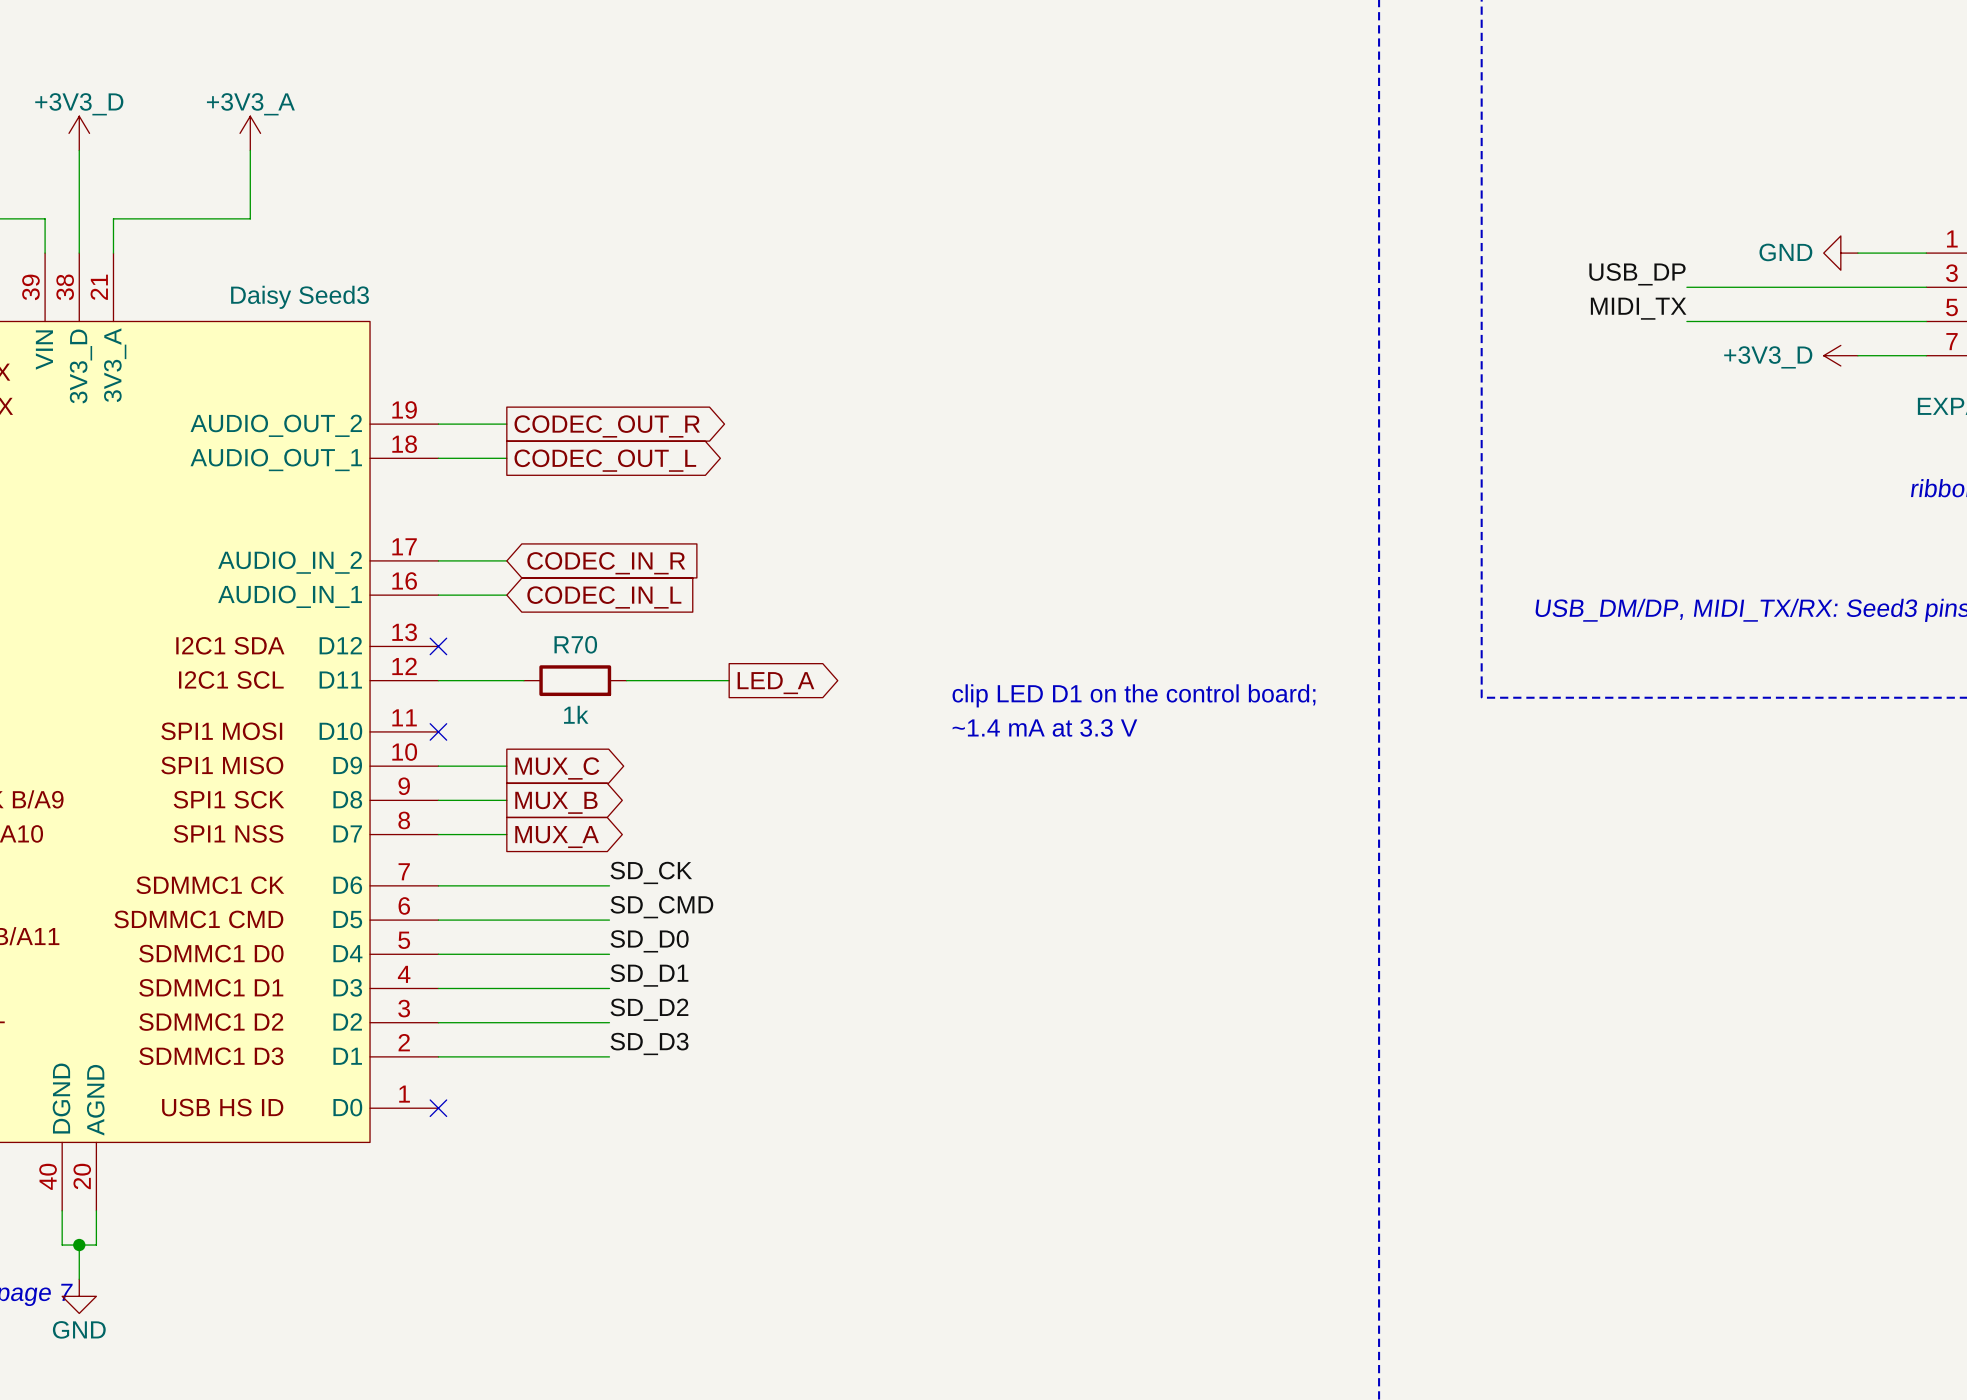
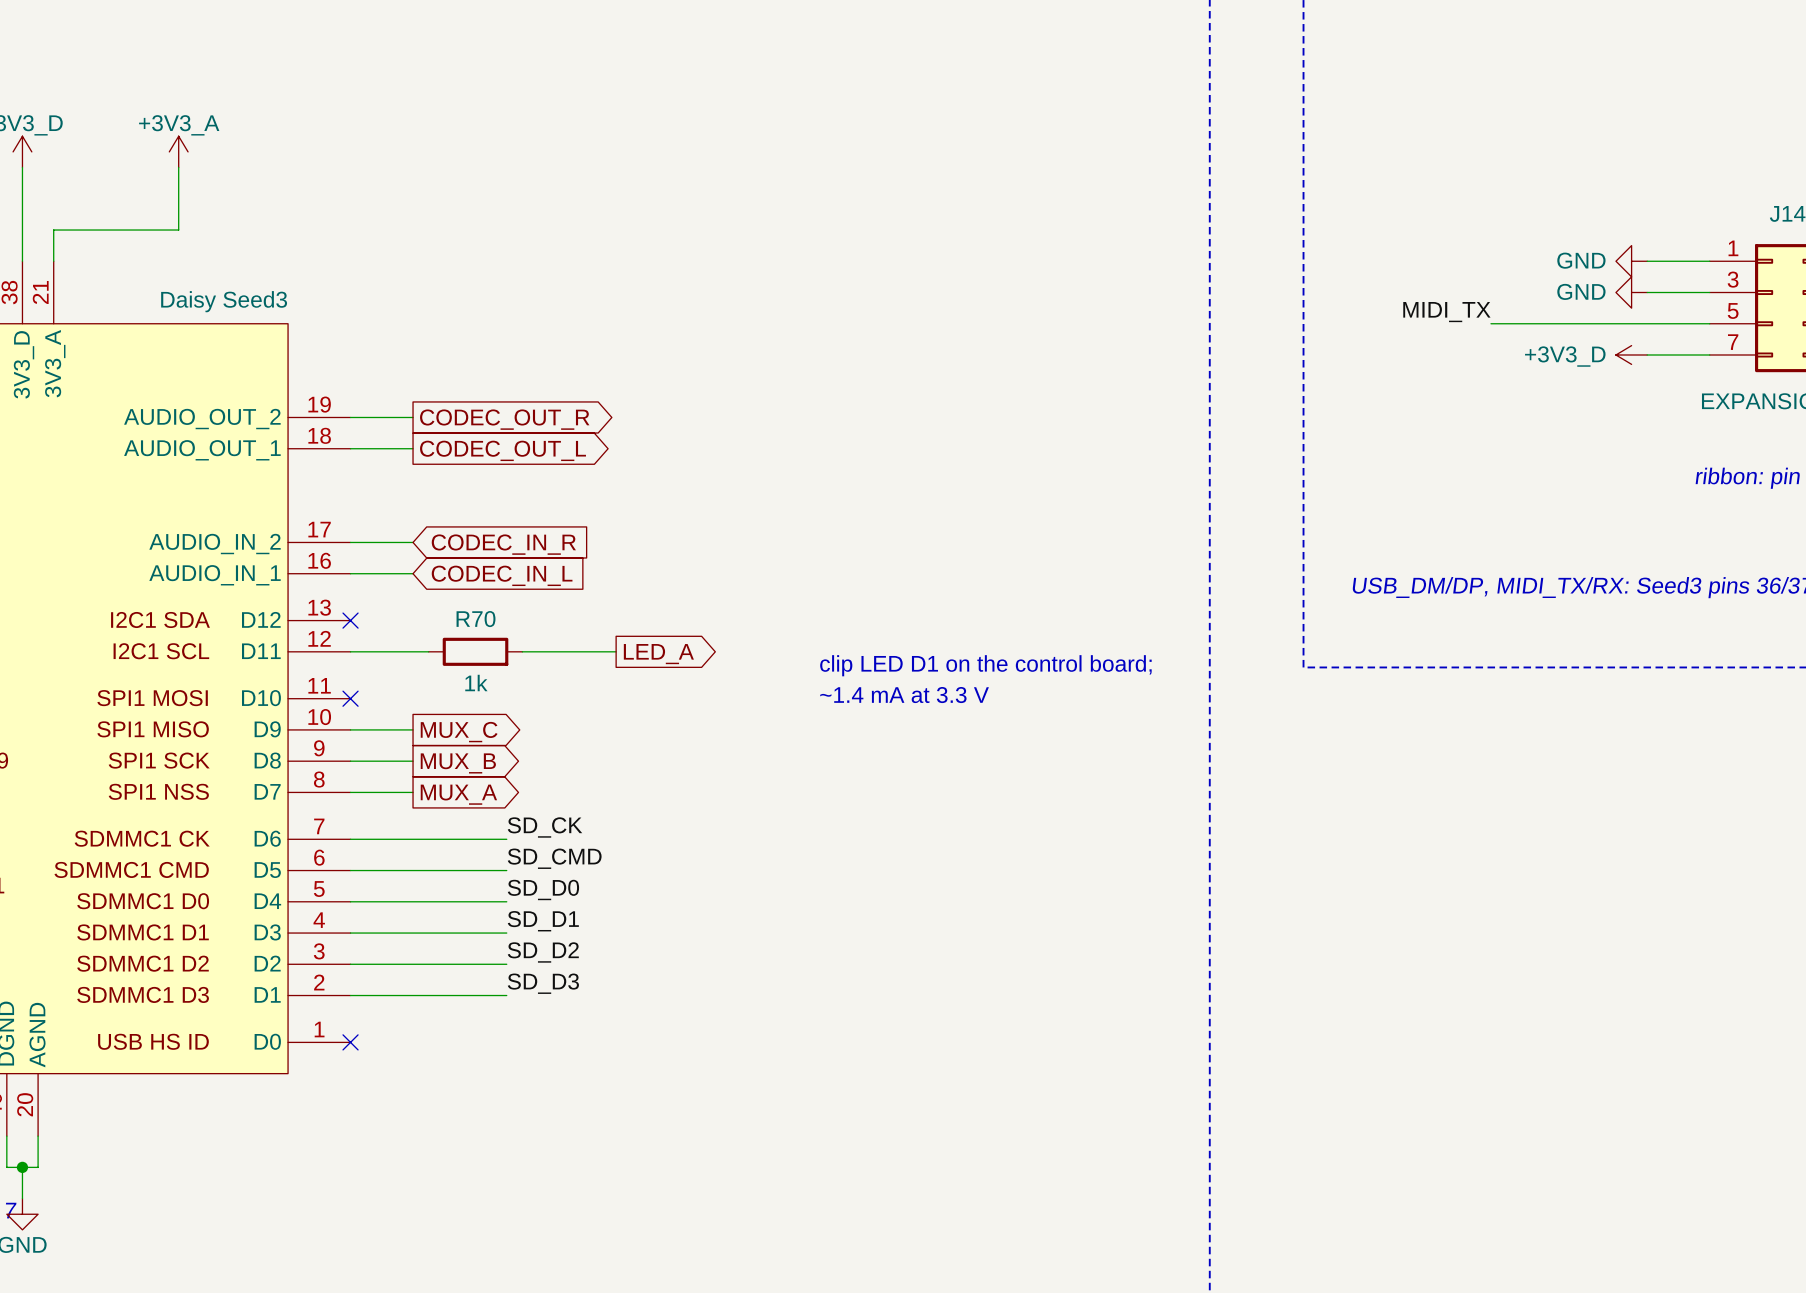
label: USB_DP (1637, 274) -> none
wire: (1686, 287) (1857, 287) -> none
power symbol: none -> GND (1631, 292)

